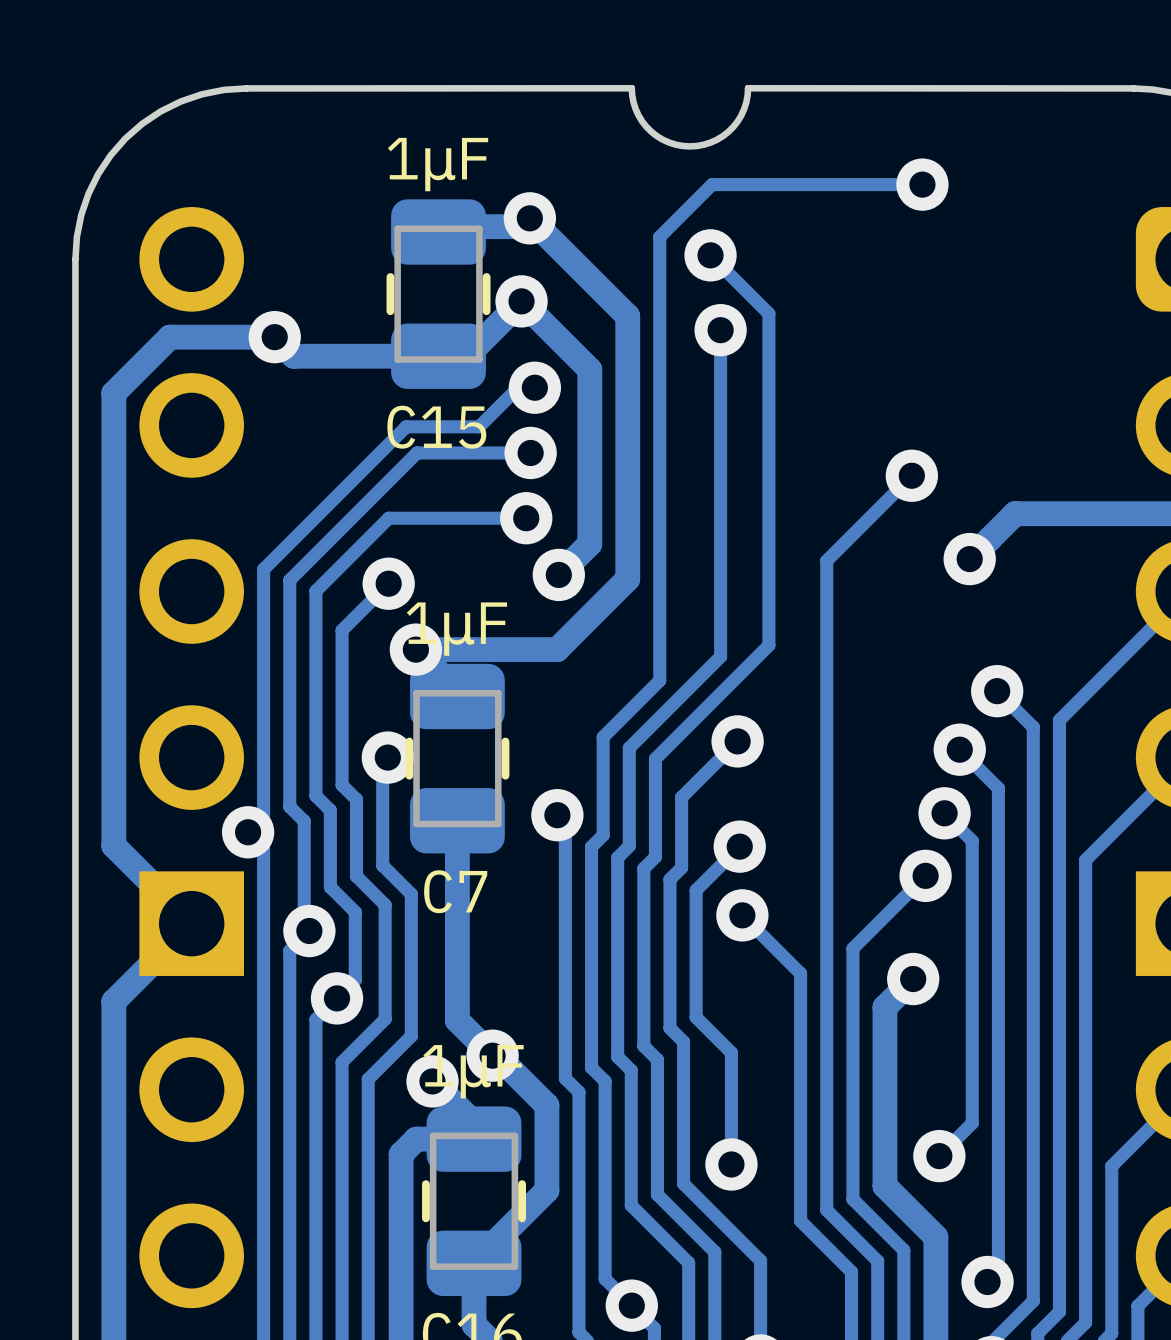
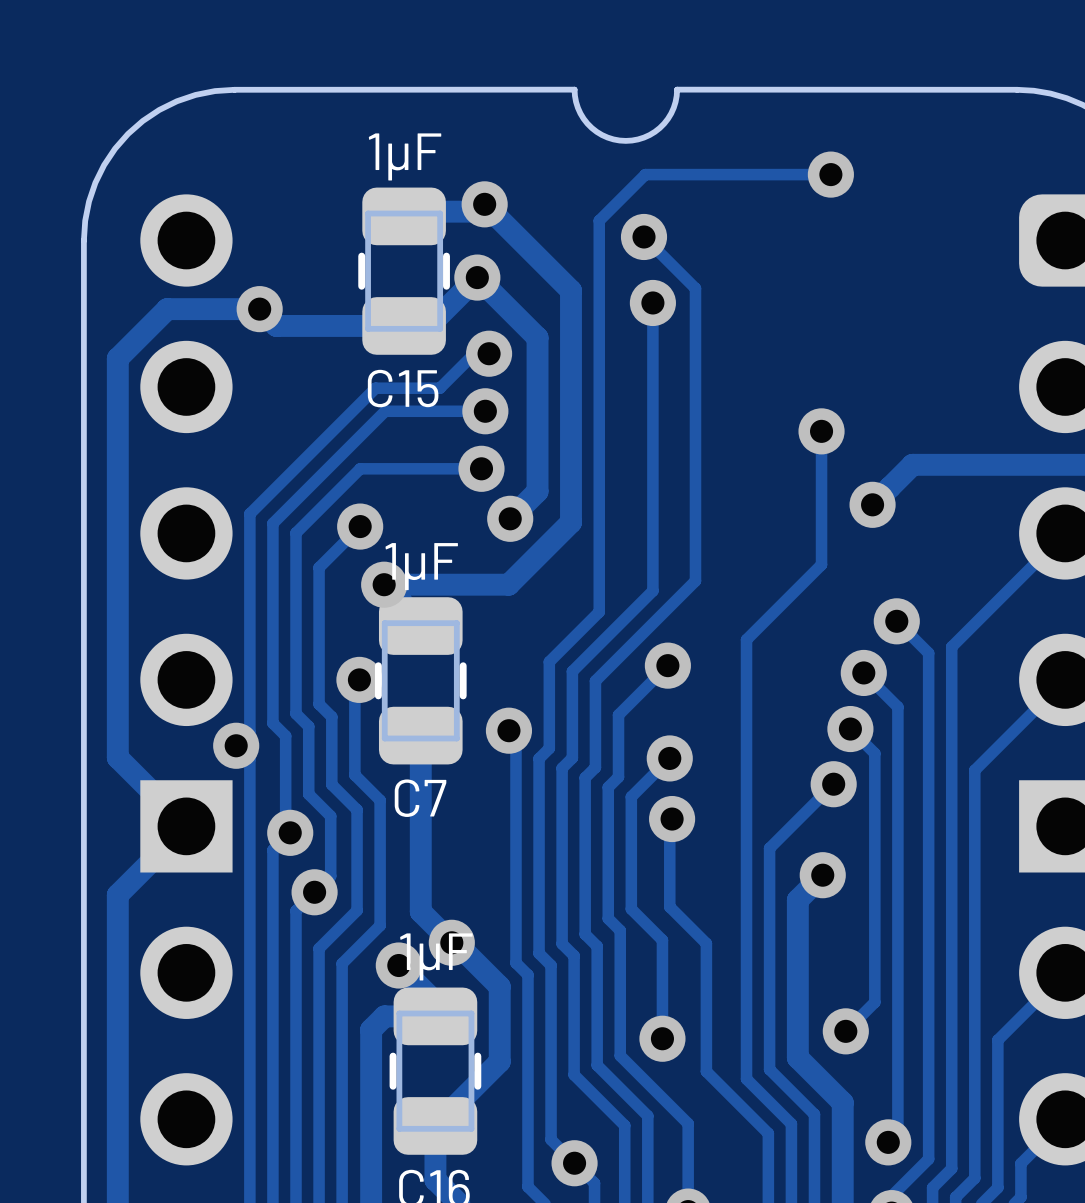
track: (911, 475) (826, 560) (826, 712) -> (821, 431) (821, 564) (746, 639)
track: (742, 915) (800, 973) (800, 1221) -> (672, 819) (669, 821) (669, 906) (706, 943) (706, 1071) (723, 1088)

